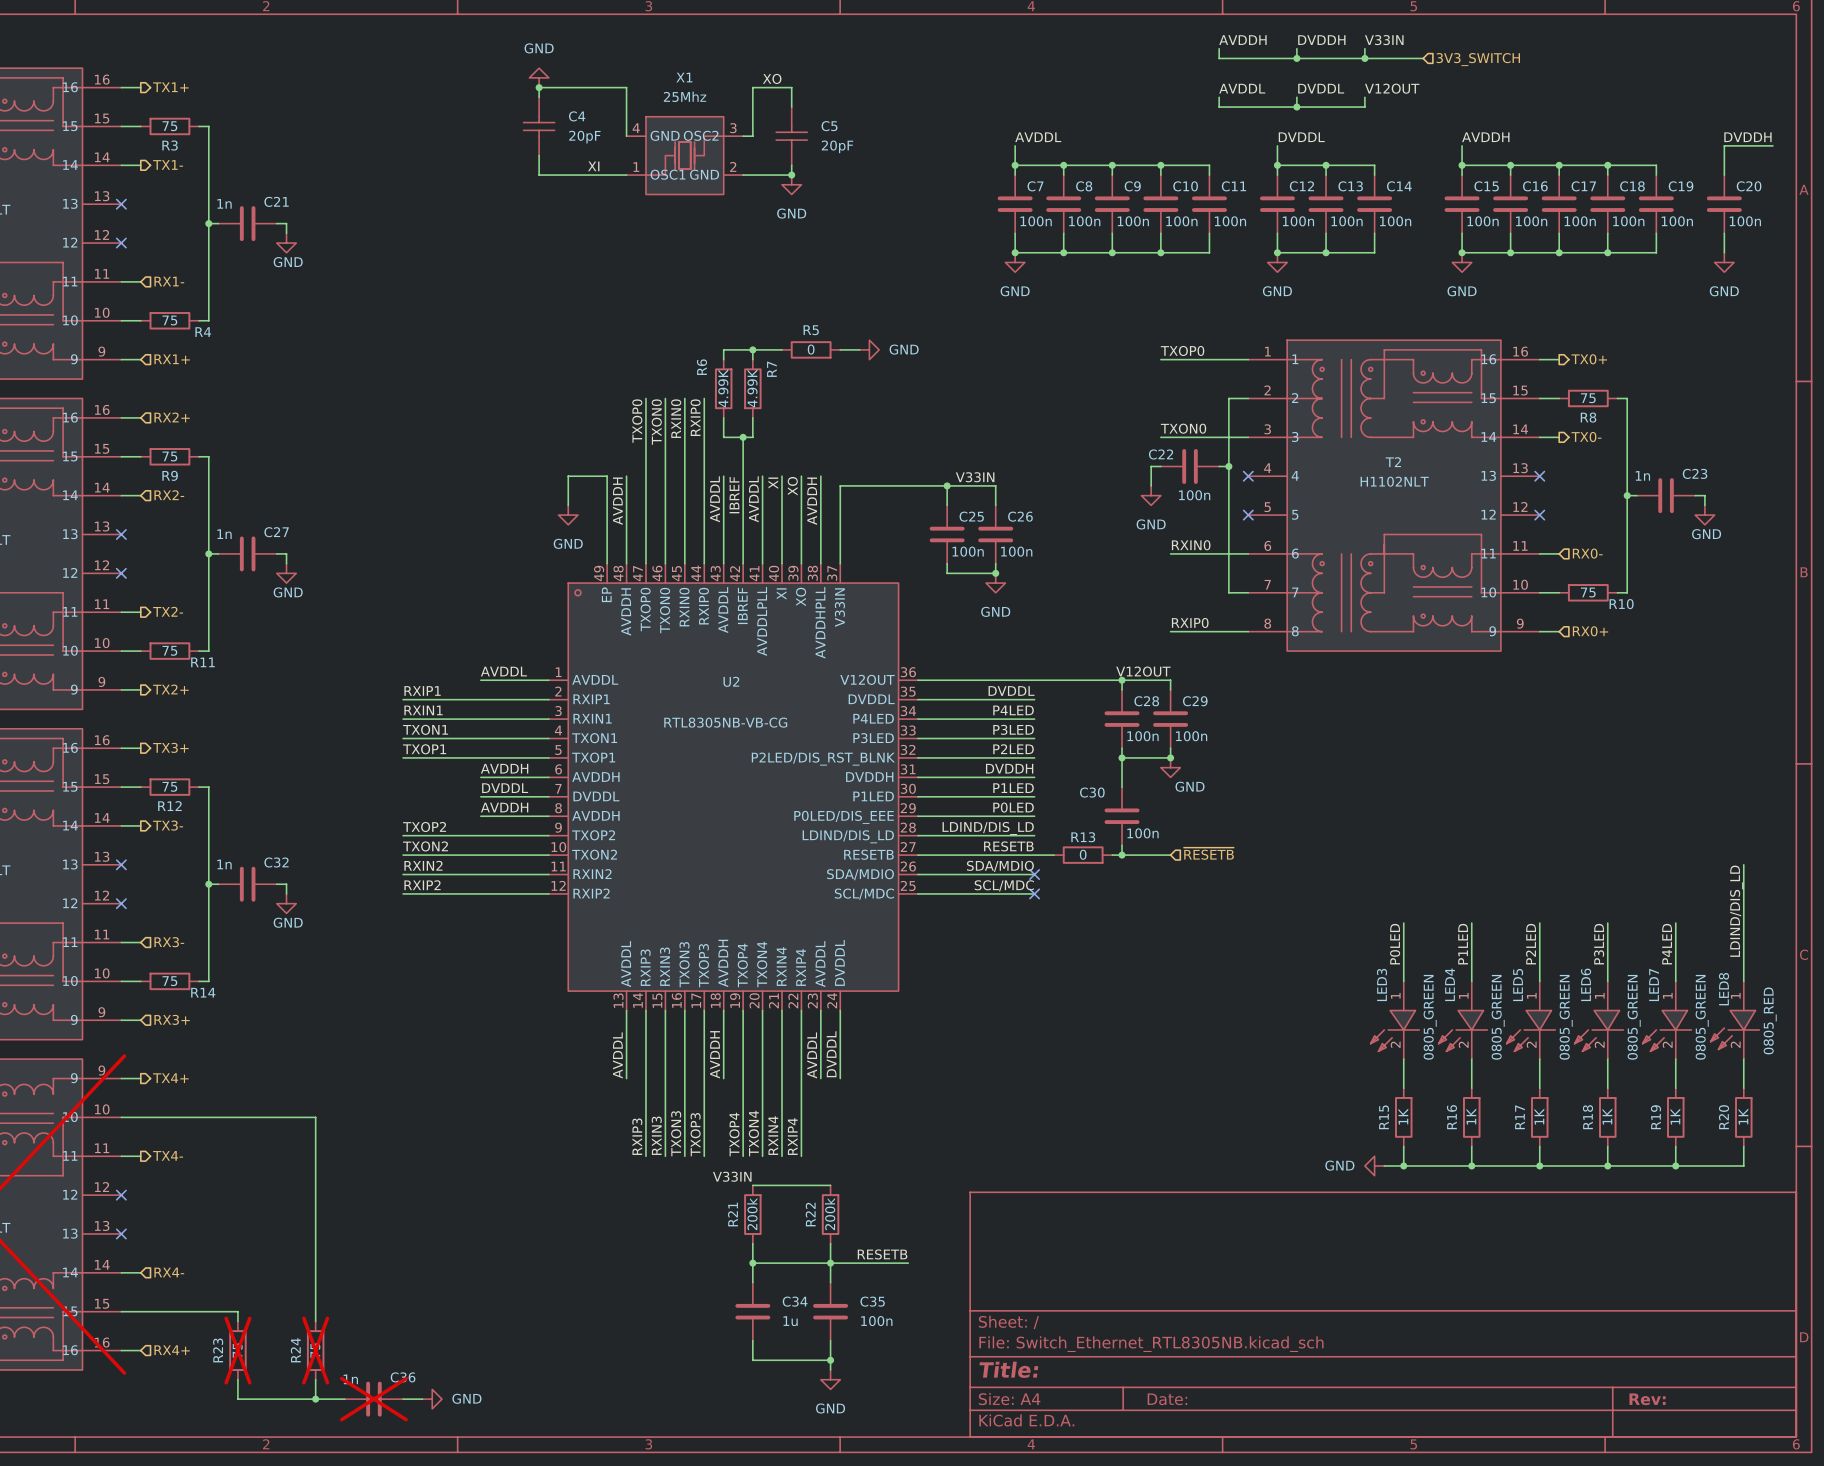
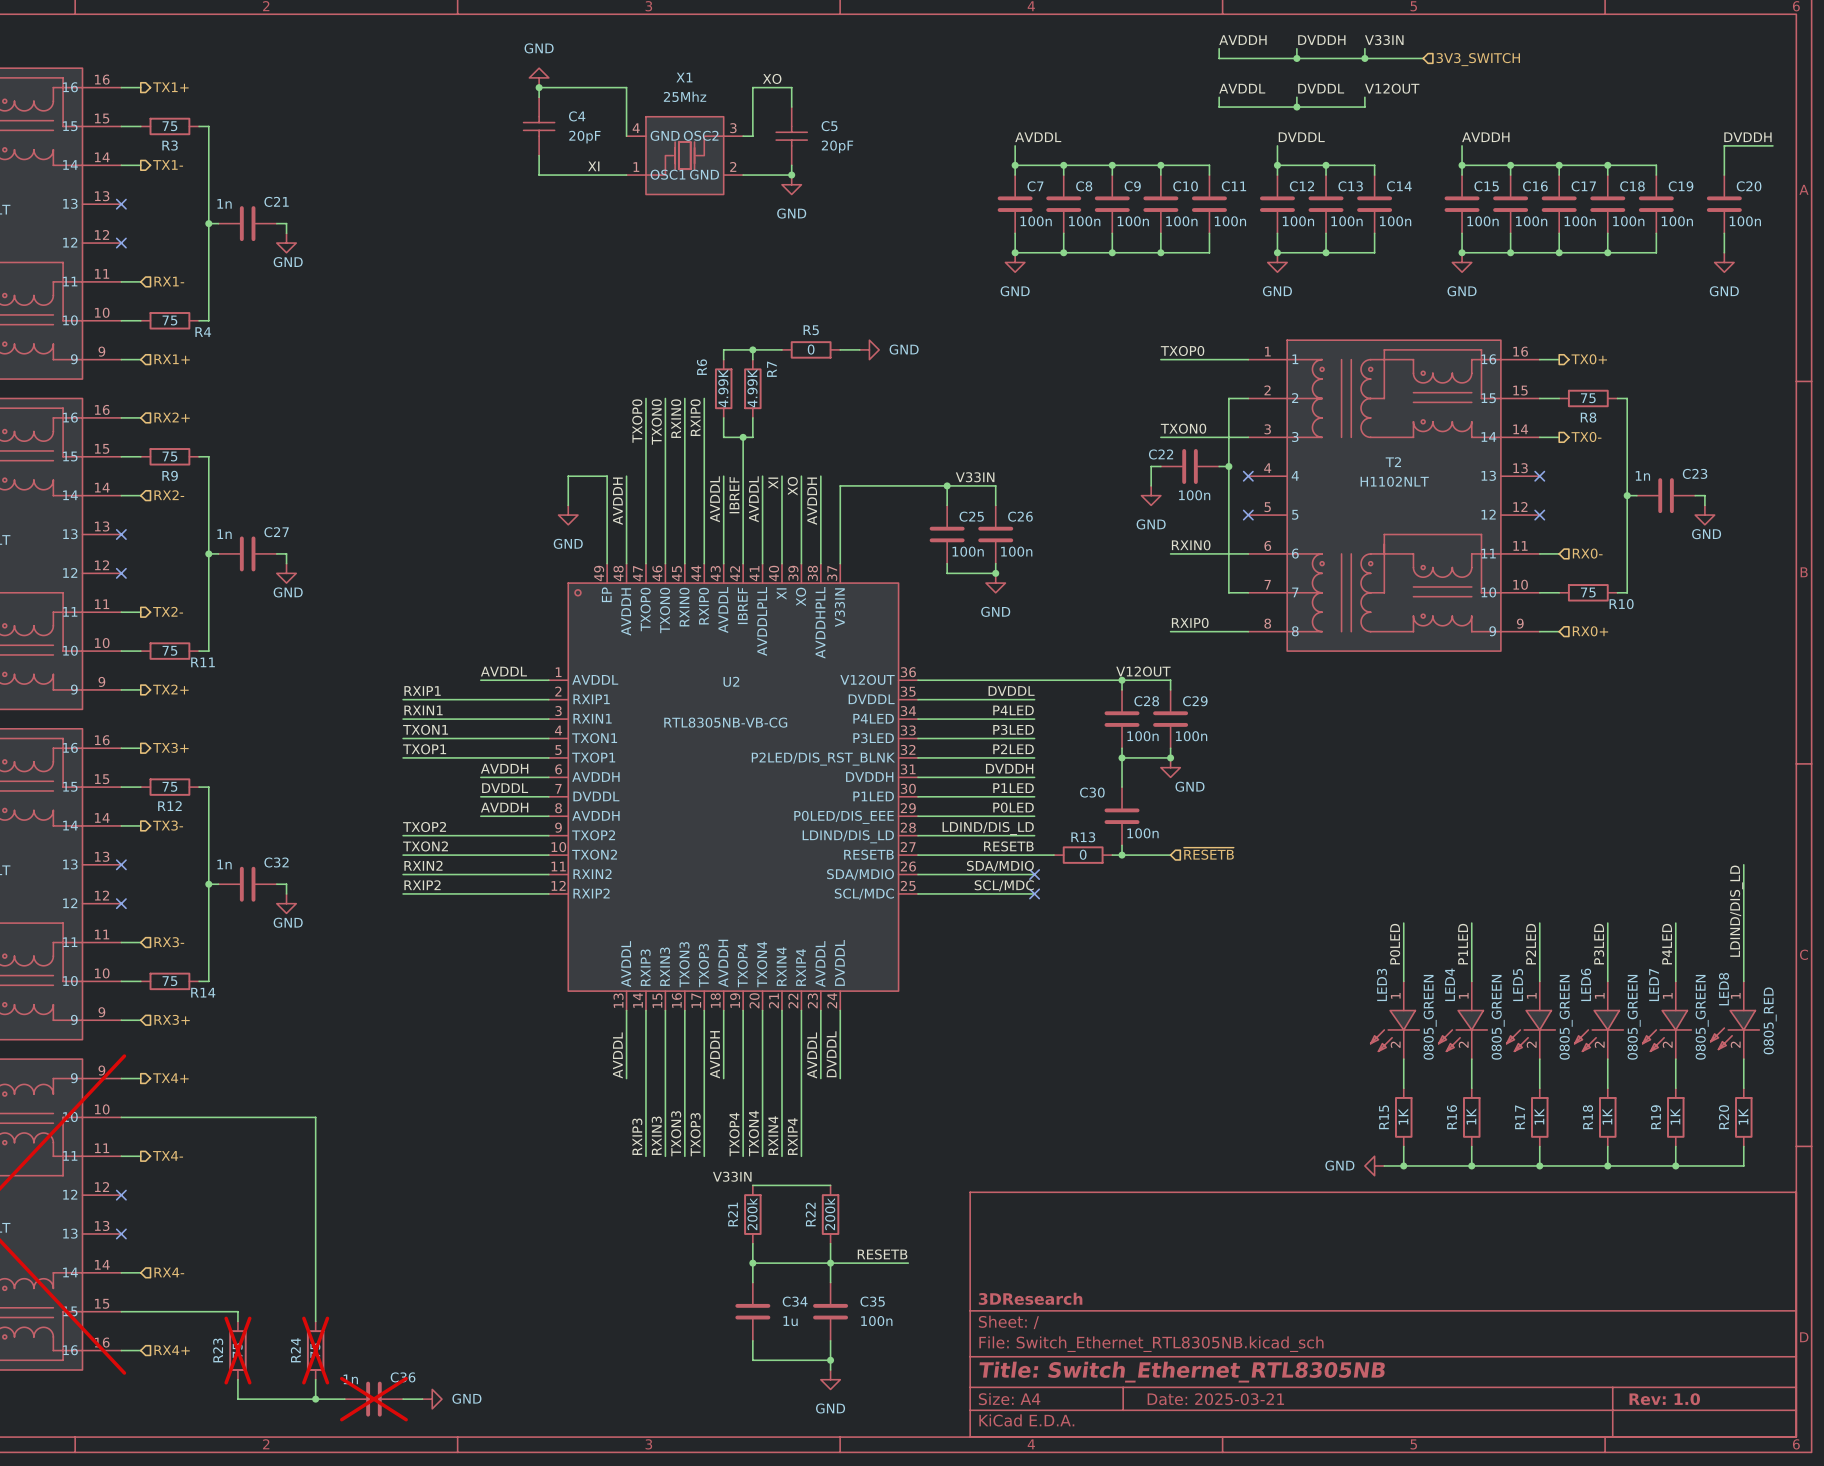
title block: none -> 3DResearch (1030, 1298)
title block: Title: (1008, 1369) -> Title: Switch_Ethernet_RTL8305NB (1182, 1372)
title block: Date: (1167, 1399) -> Date: 2025-03-21 (1215, 1399)
title block: Rev: (1647, 1399) -> Rev: 1.0 (1664, 1399)

